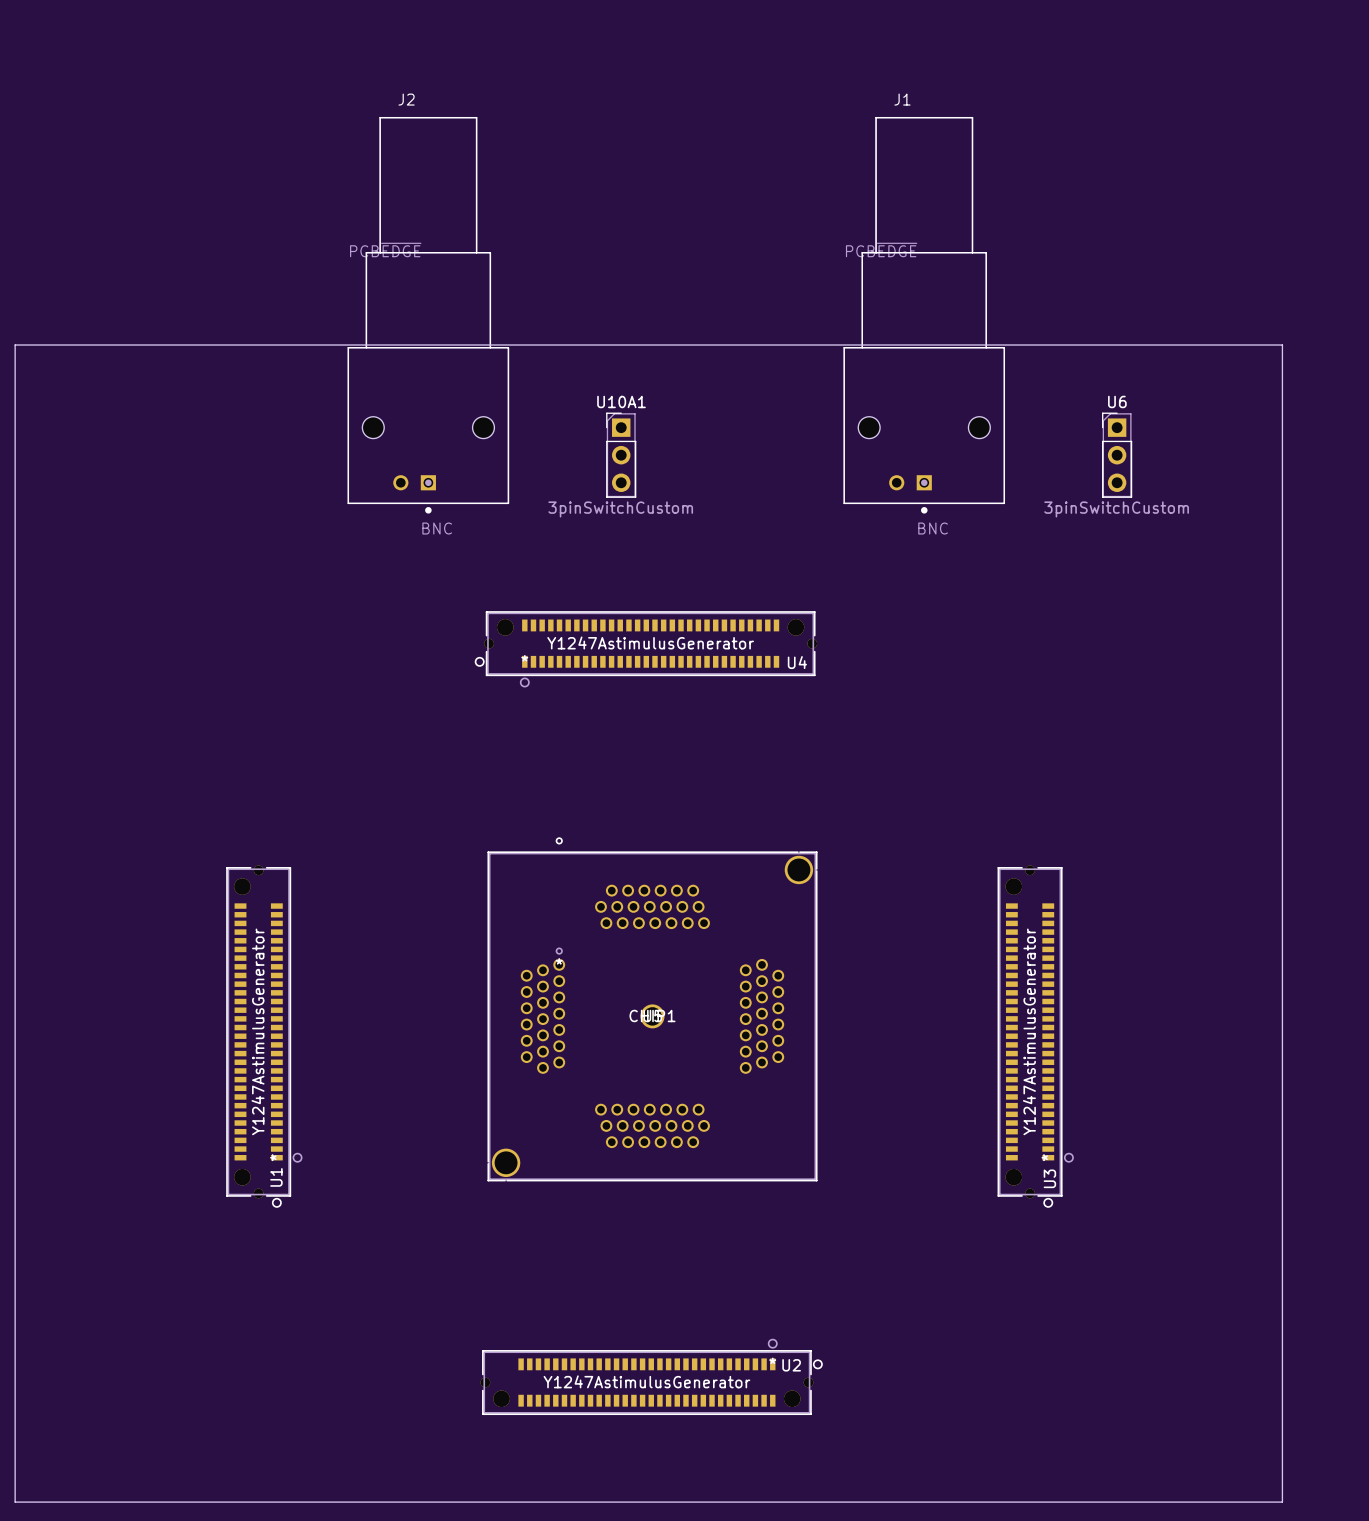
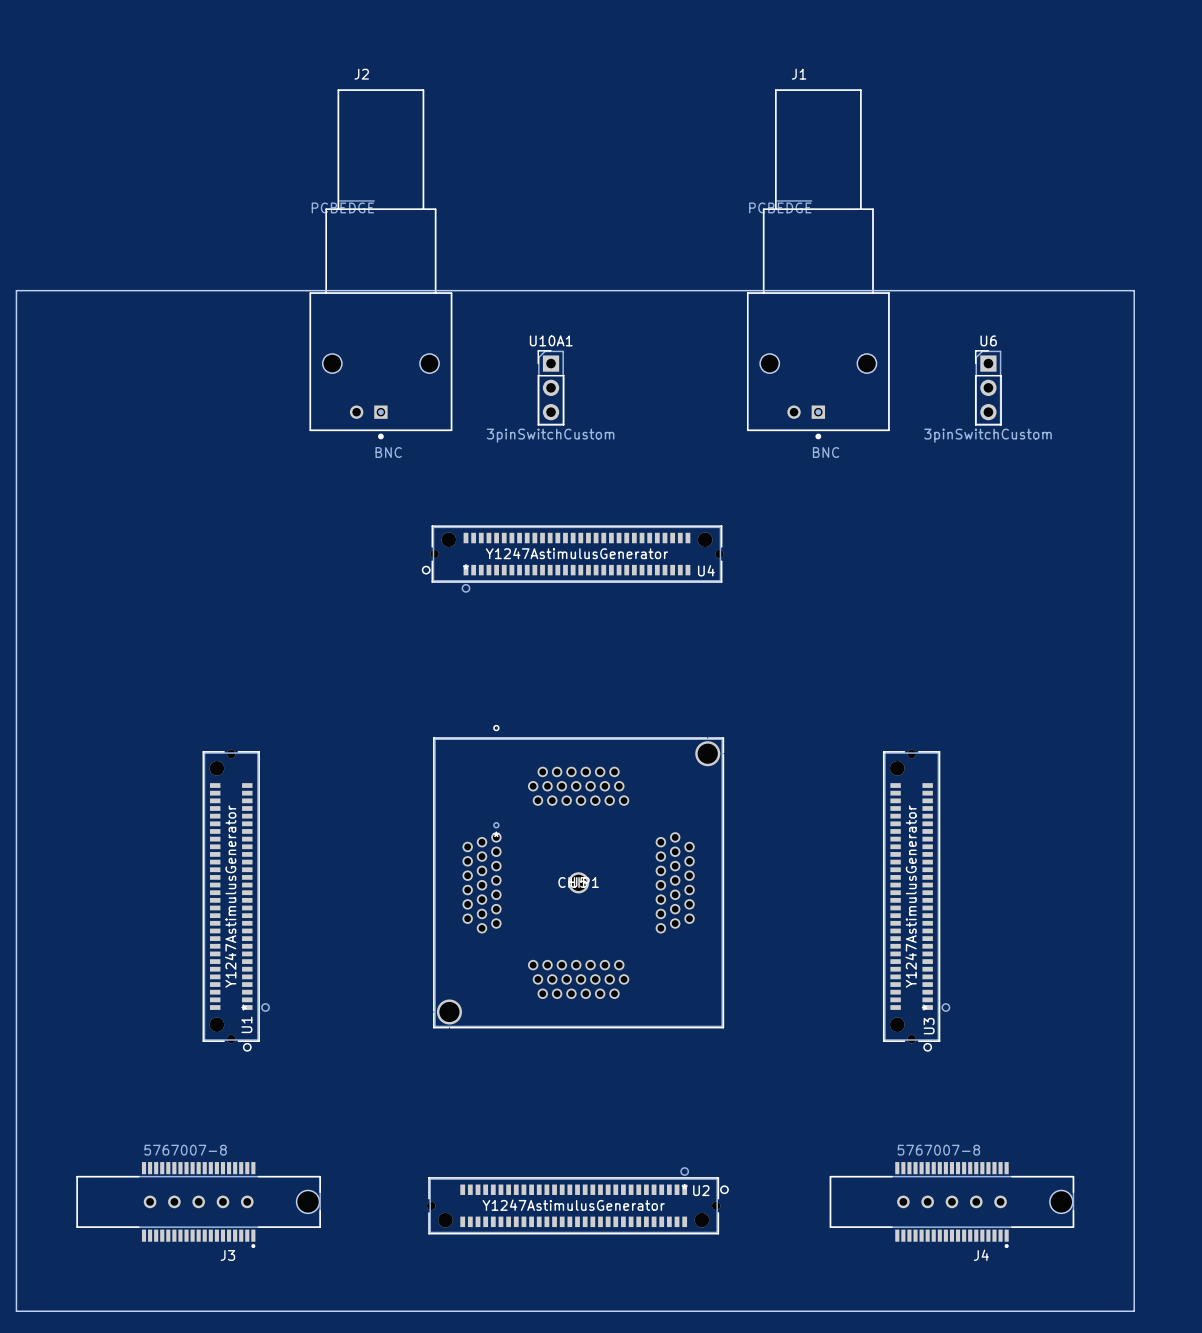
J3: none -> 5767007-8 (198, 1205)
J4: none -> 5767007-8 (951, 1205)

